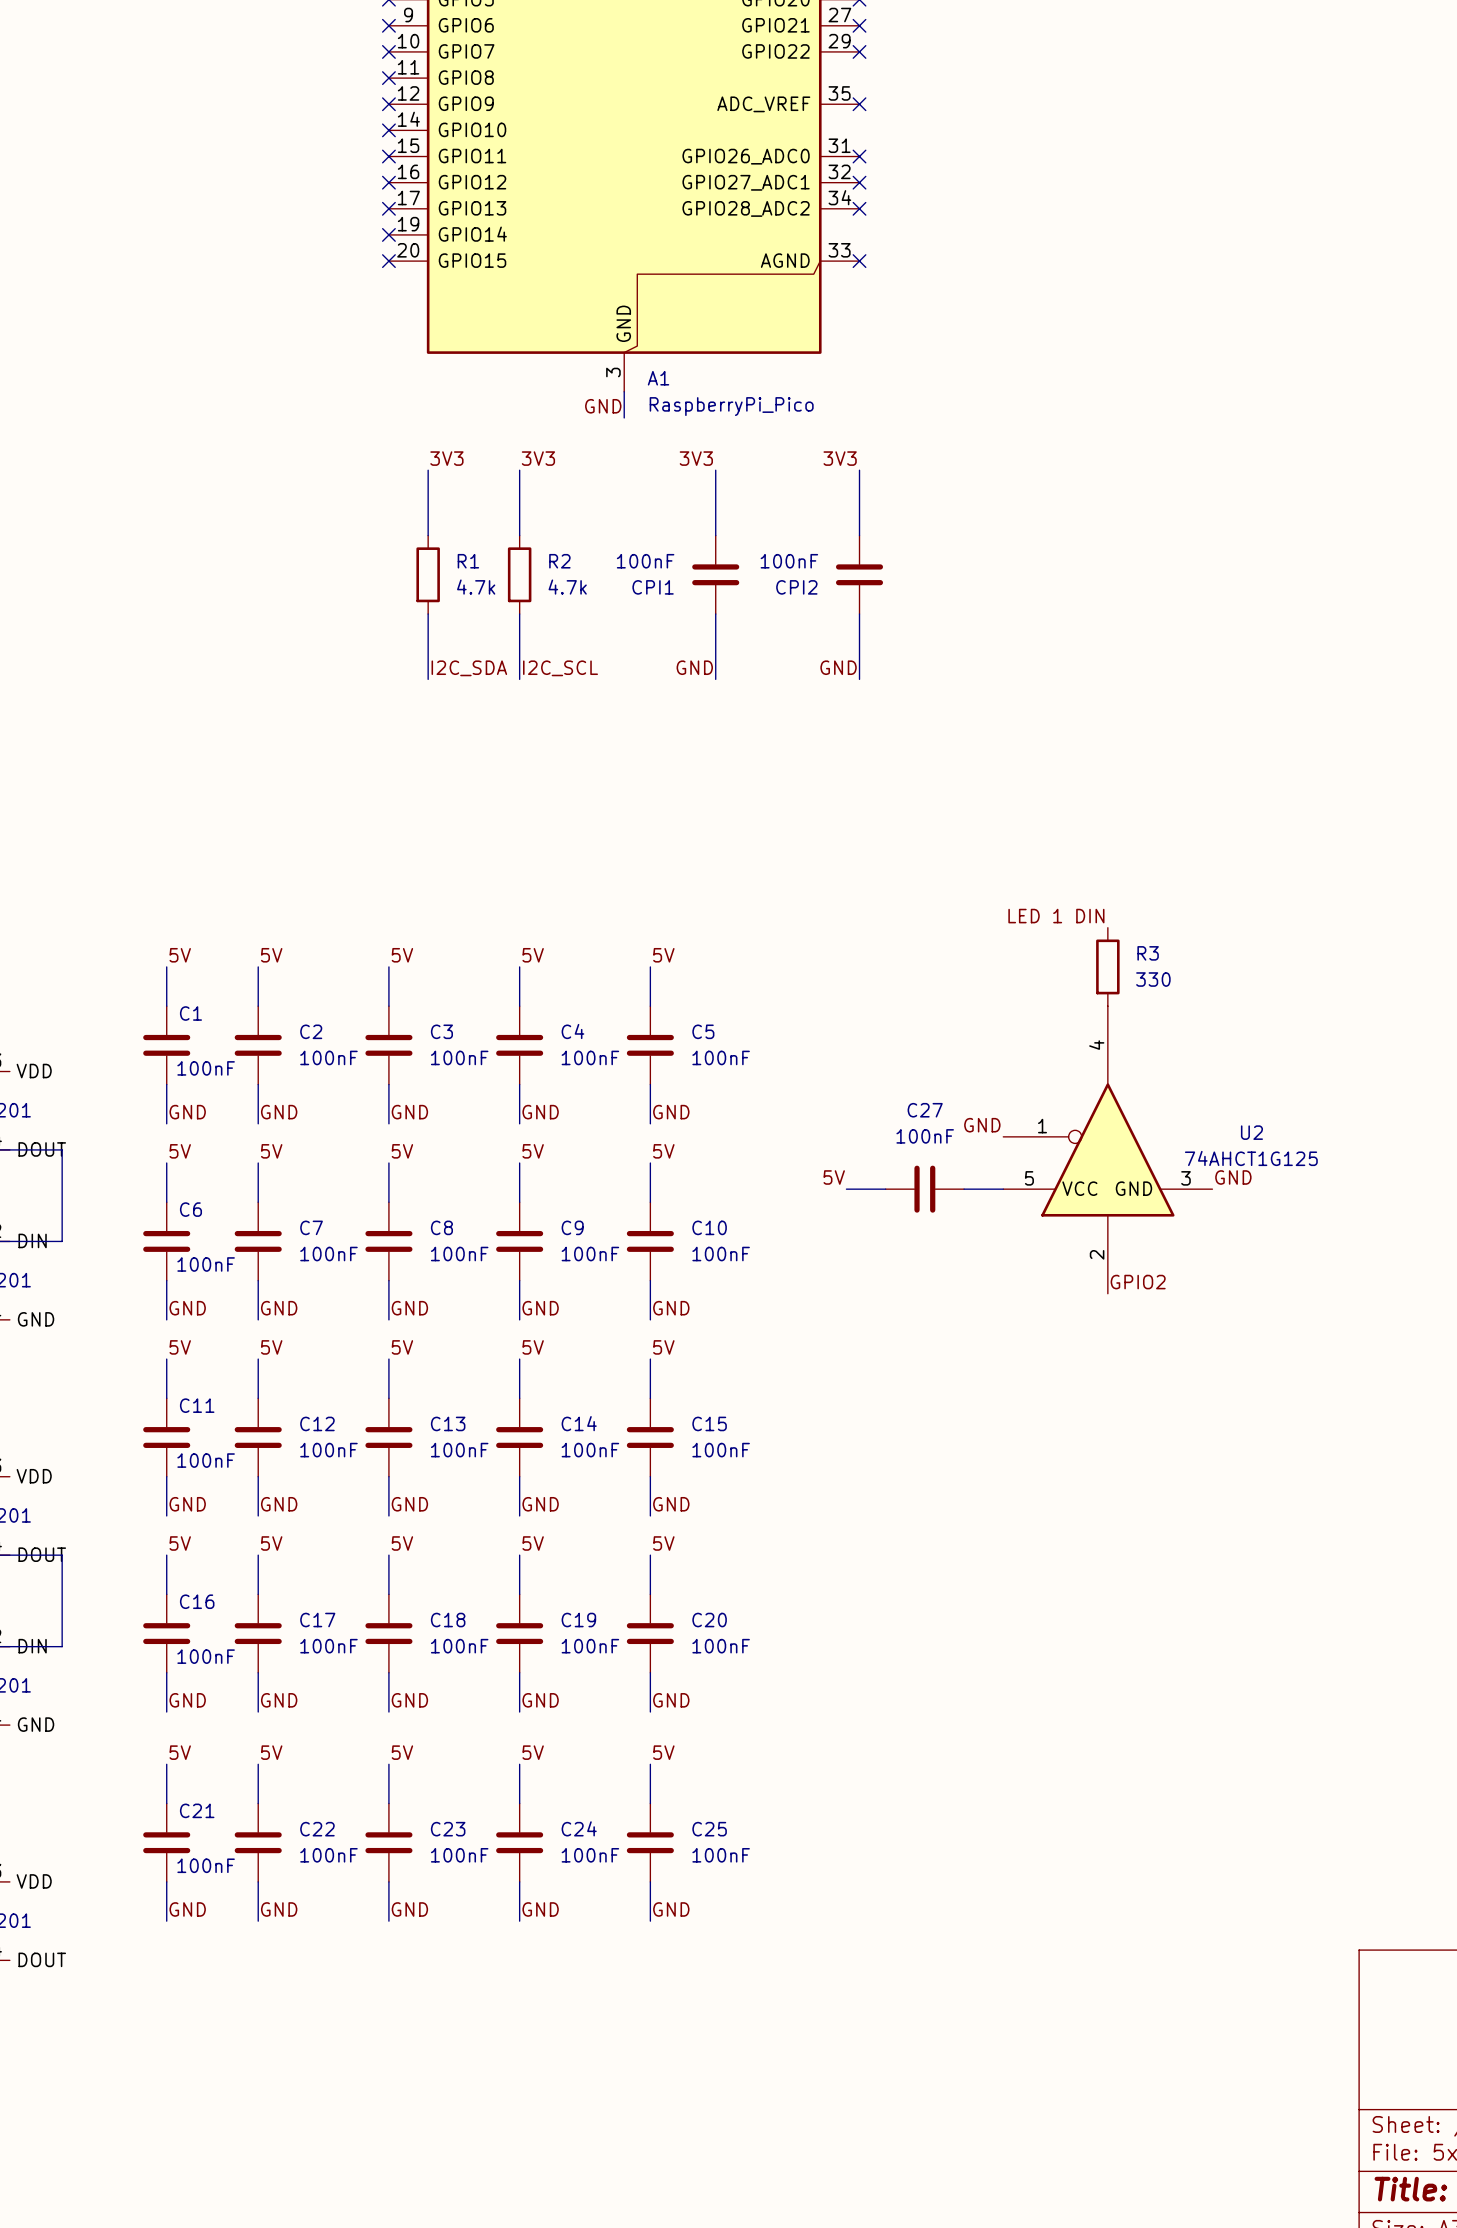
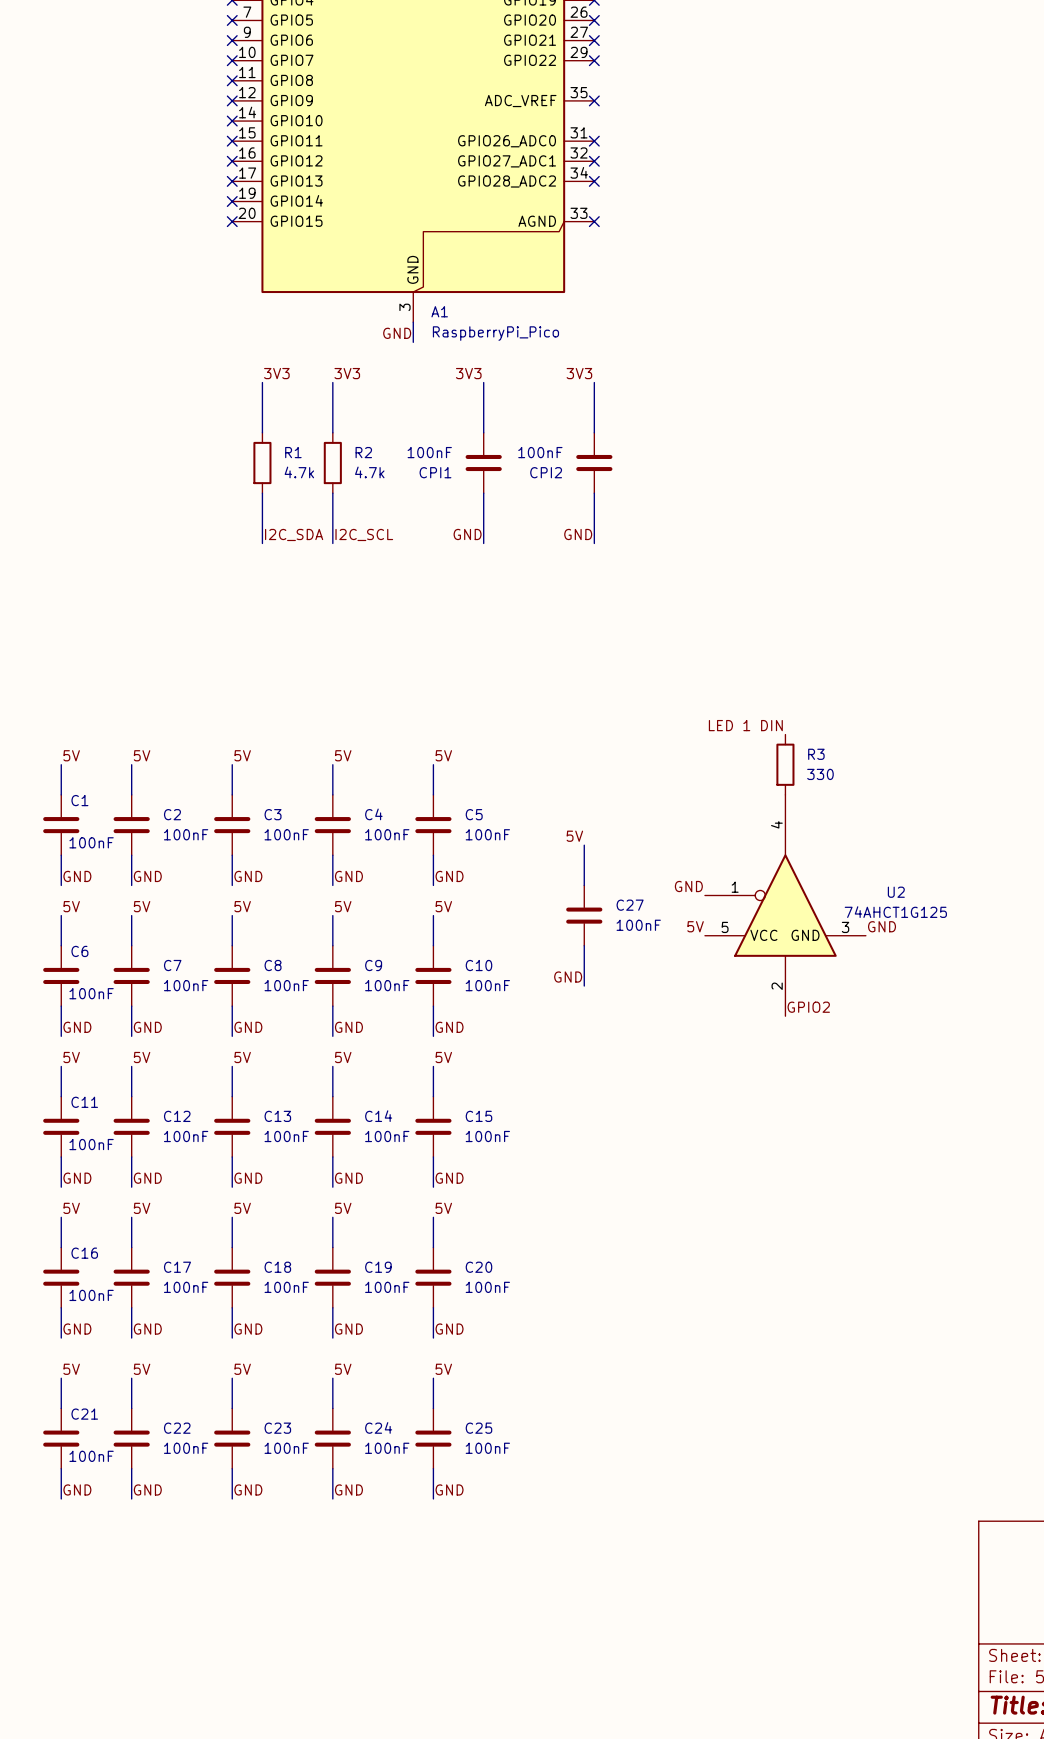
label: none -> 5V (574, 836)
wire: none -> (584, 845) (584, 885)
C27 name position: C27 (925, 1110) -> C27 (630, 905)
C27 value position: 100nF (925, 1136) -> 100nF (638, 925)
label: 5V (834, 1177) -> none
label: none -> 5V (695, 926)
wire: (846, 1189) (885, 1189) -> none
C27 rotation: 0° (924, 1189) -> 90° clockwise (584, 915)
C27 position: (924, 1189) -> (584, 915)
wire: (964, 1189) (1003, 1189) -> none
wire: none -> (584, 945) (584, 986)
label: none -> GND (568, 977)

